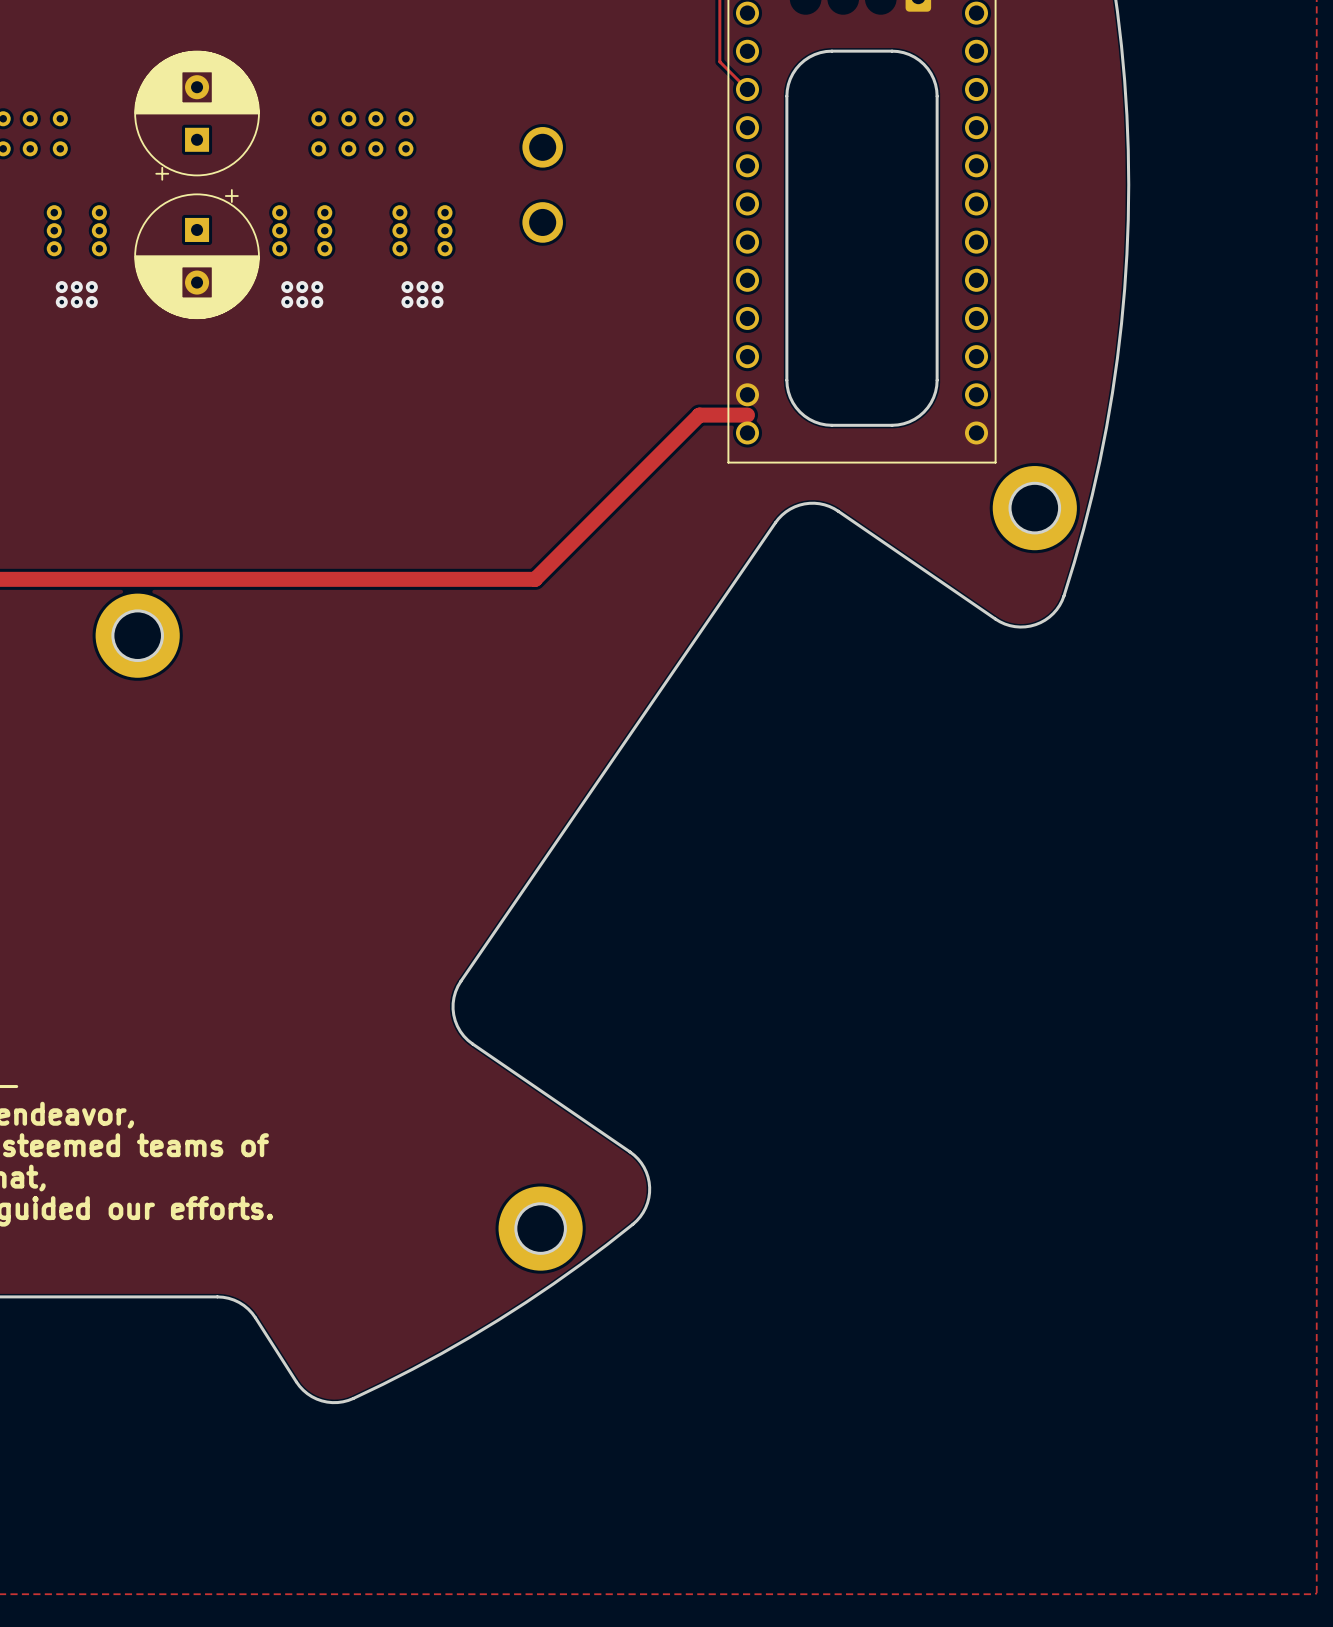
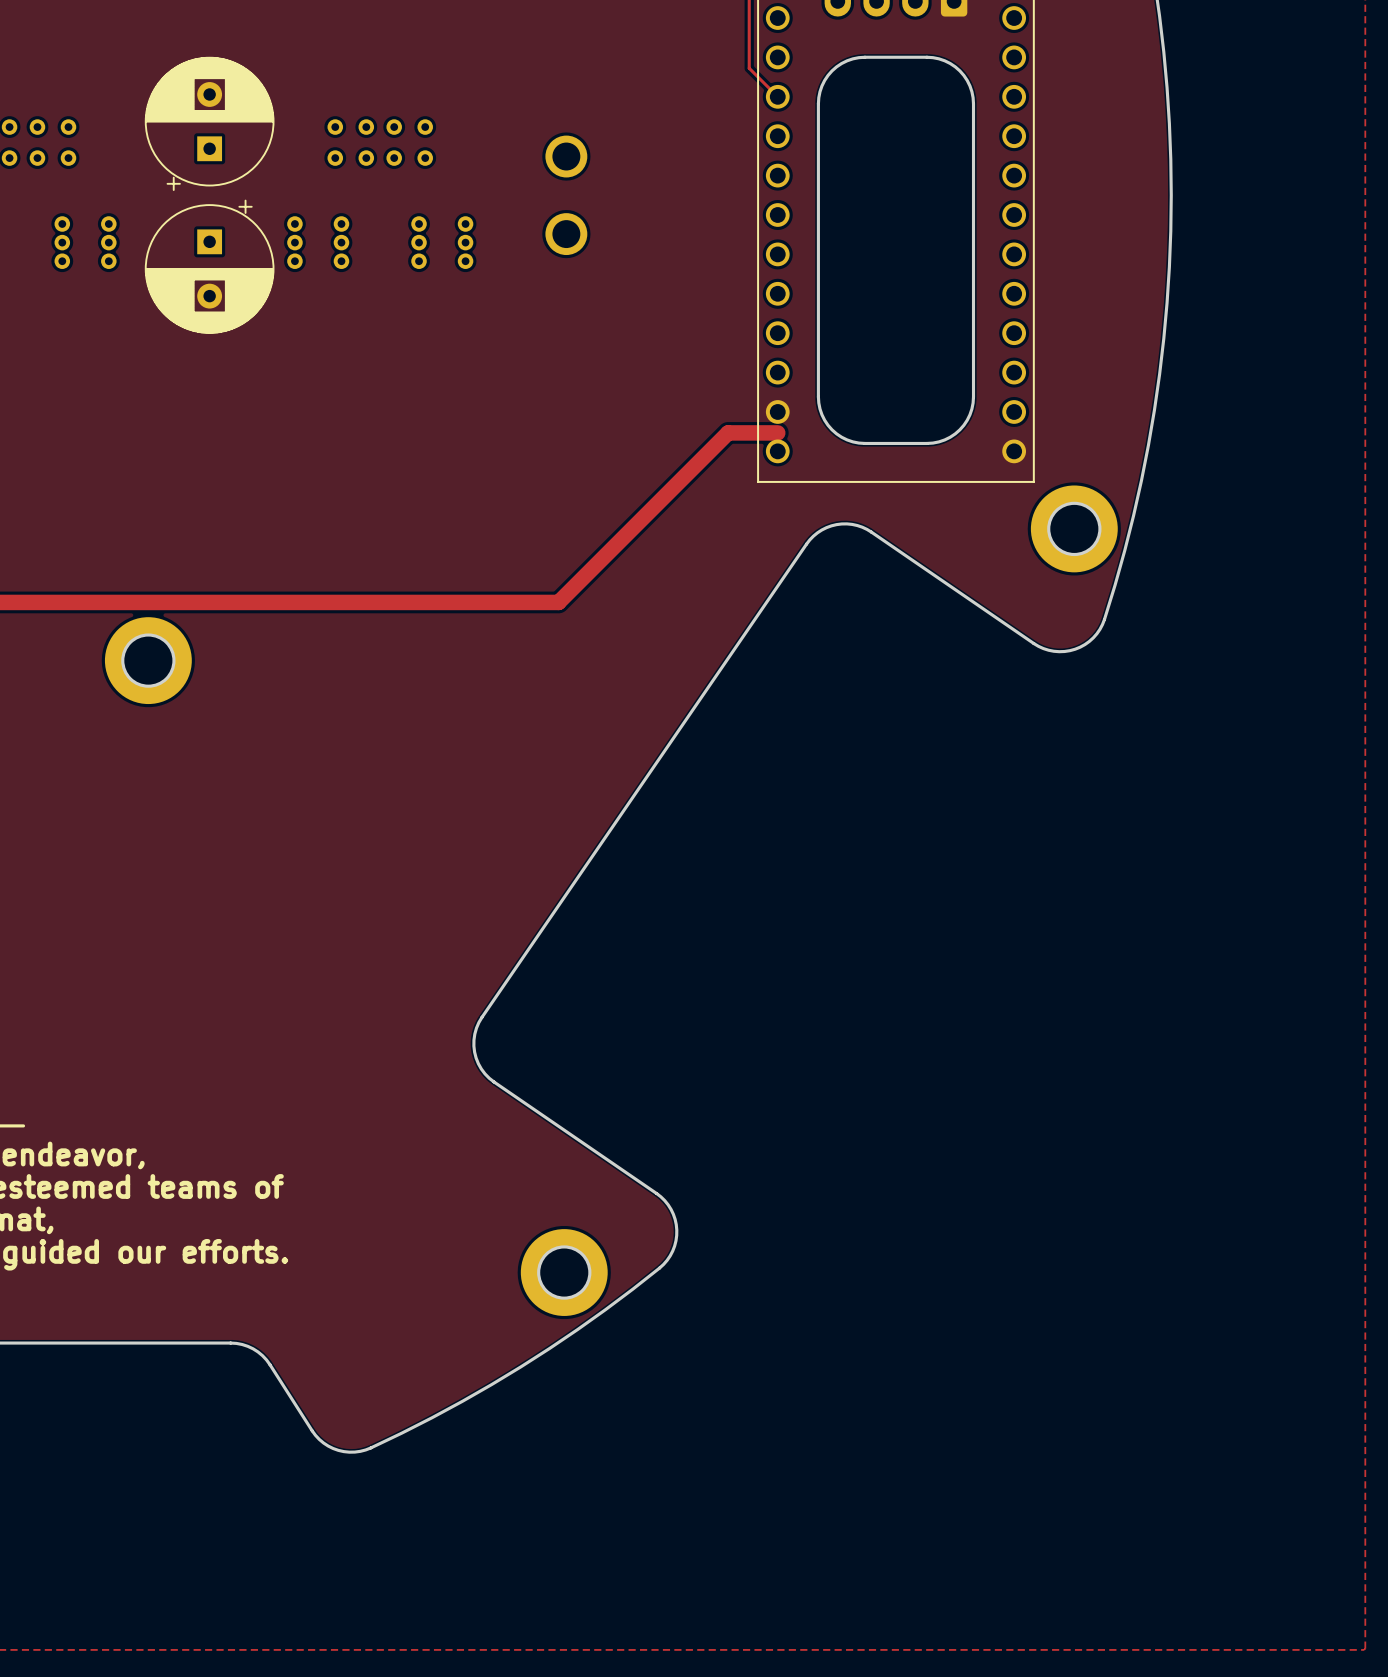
via: (61, 287) -> none
via: (76, 287) -> none
via: (91, 287) -> none
via: (287, 287) -> none
via: (302, 287) -> none
via: (317, 287) -> none
via: (407, 287) -> none
via: (422, 287) -> none
via: (437, 287) -> none
via: (61, 302) -> none
via: (76, 302) -> none
via: (91, 302) -> none
via: (287, 302) -> none
via: (302, 302) -> none
via: (317, 302) -> none
via: (407, 302) -> none
via: (422, 302) -> none
via: (437, 302) -> none

